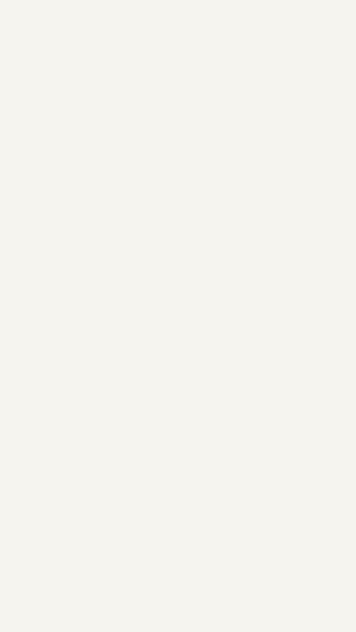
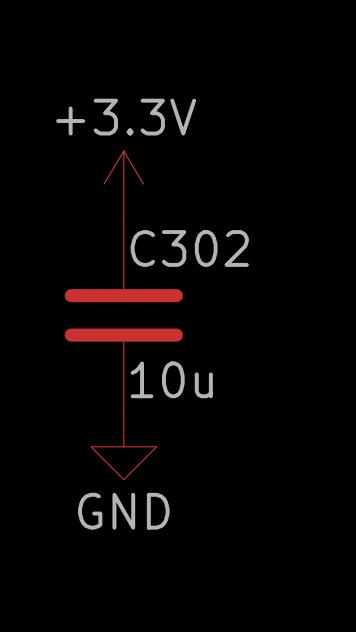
power symbol: none -> +3.3V (123, 184)
C302: none -> 10u (123, 315)
power symbol: none -> GND (123, 446)

